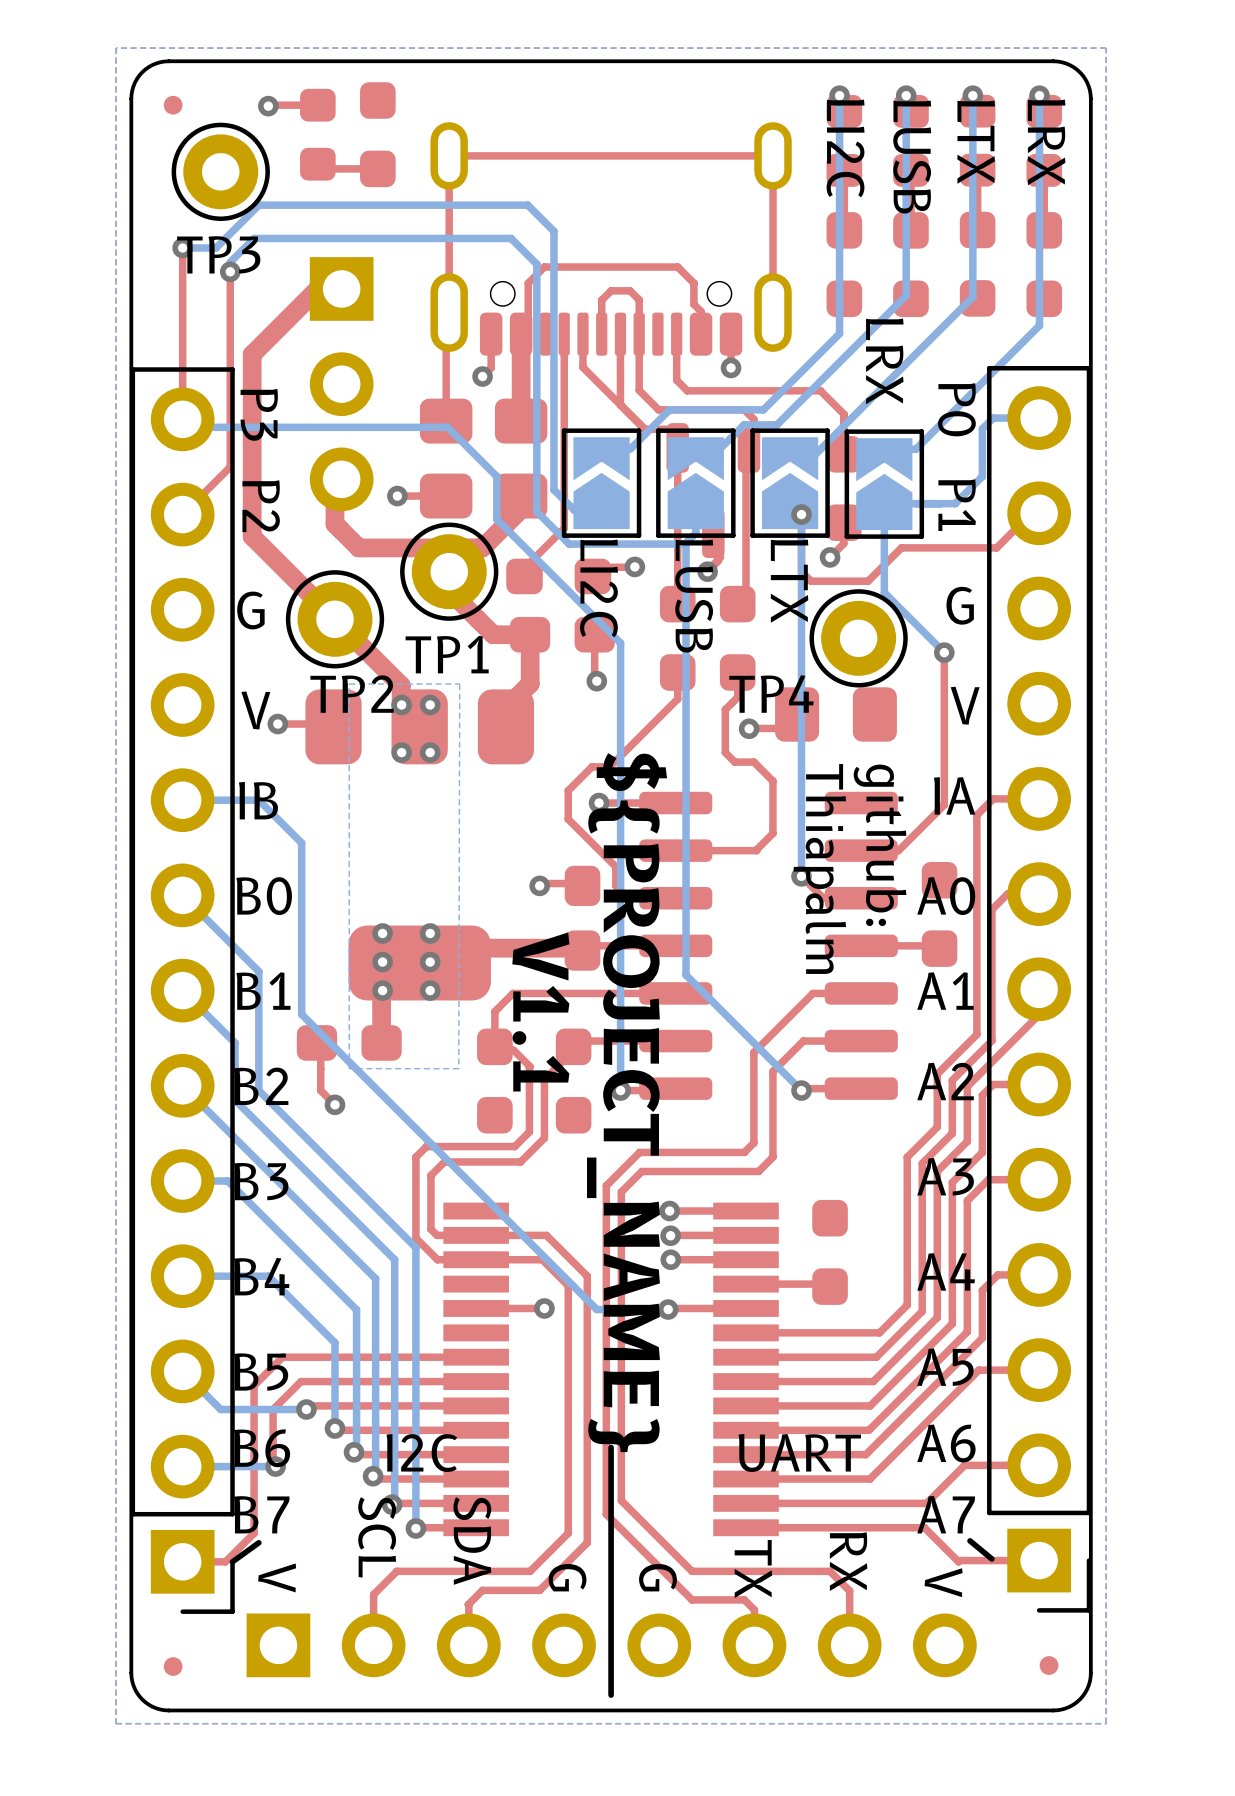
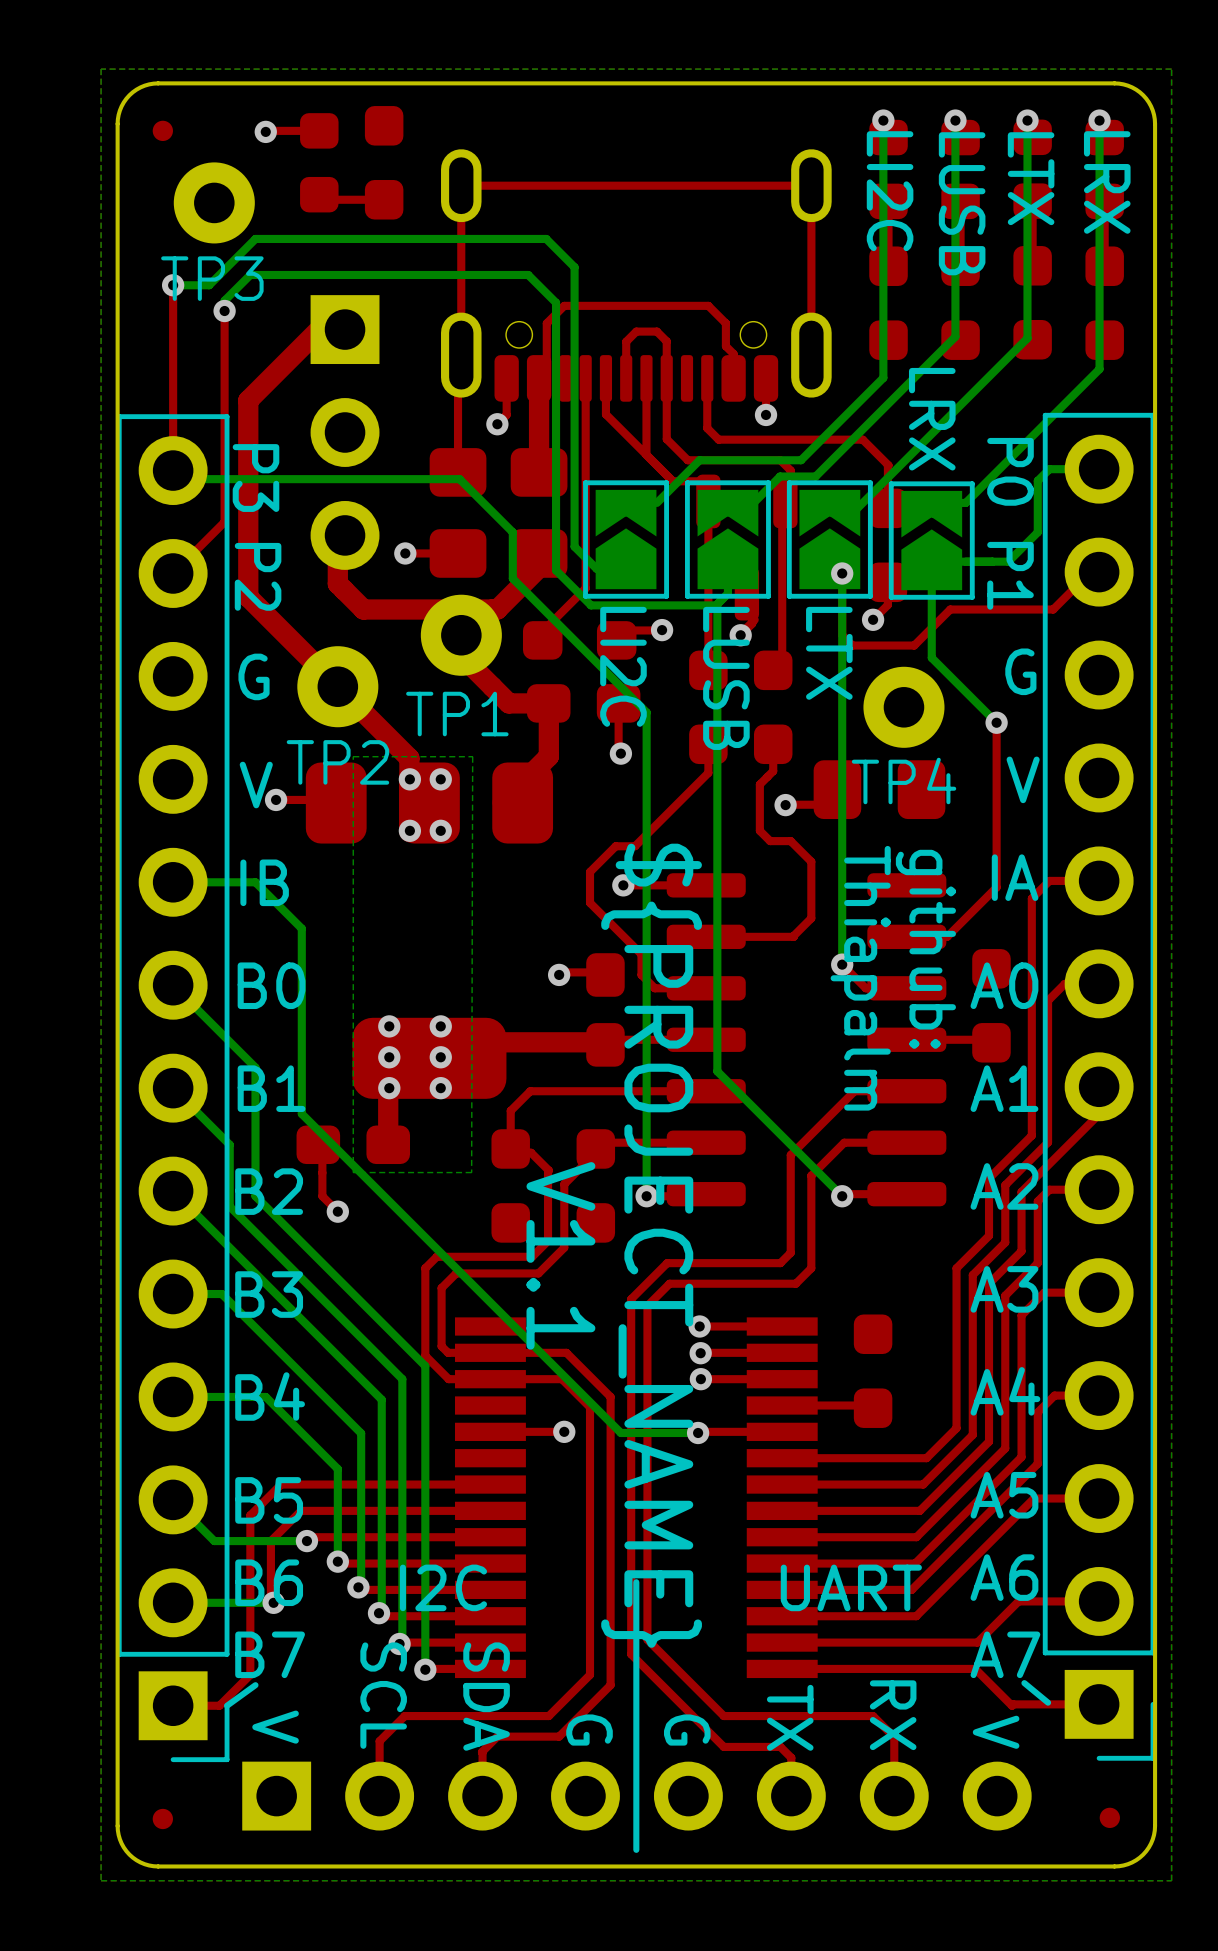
TP3 footprint: [171, 122, 270, 221] -> [173, 162, 255, 244]
TP1 footprint: [400, 522, 499, 621] -> [420, 594, 502, 676]
TP2 footprint: [285, 570, 385, 669] -> [297, 646, 379, 728]
TP4 footprint: [809, 589, 908, 688] -> [863, 666, 945, 748]
TP4 name position: TP4 (771, 694) -> TP4 (904, 780)

